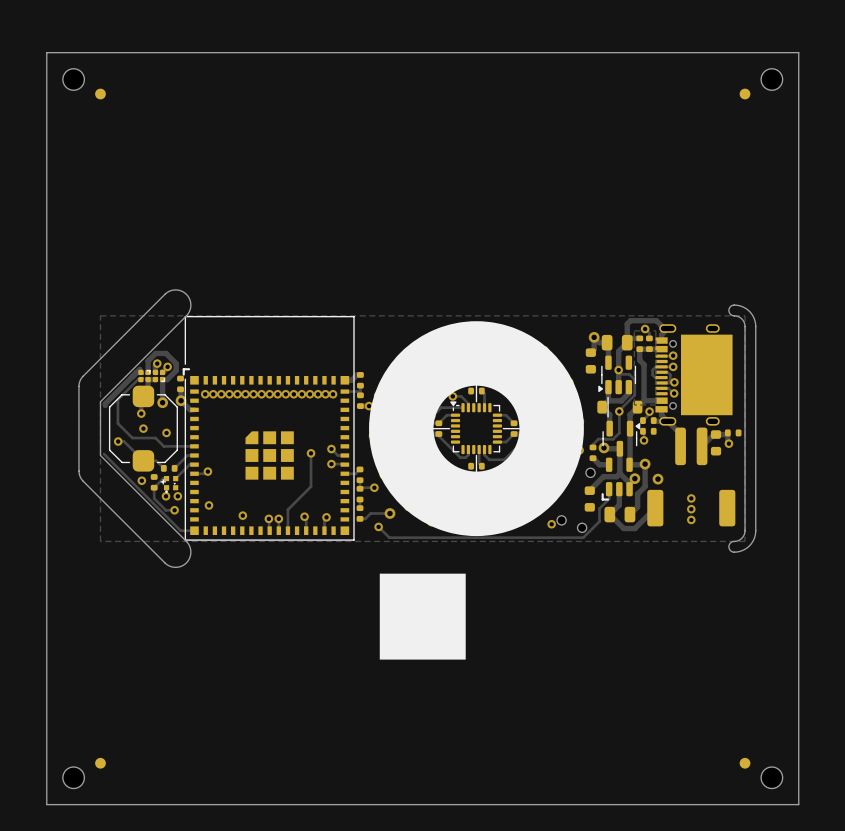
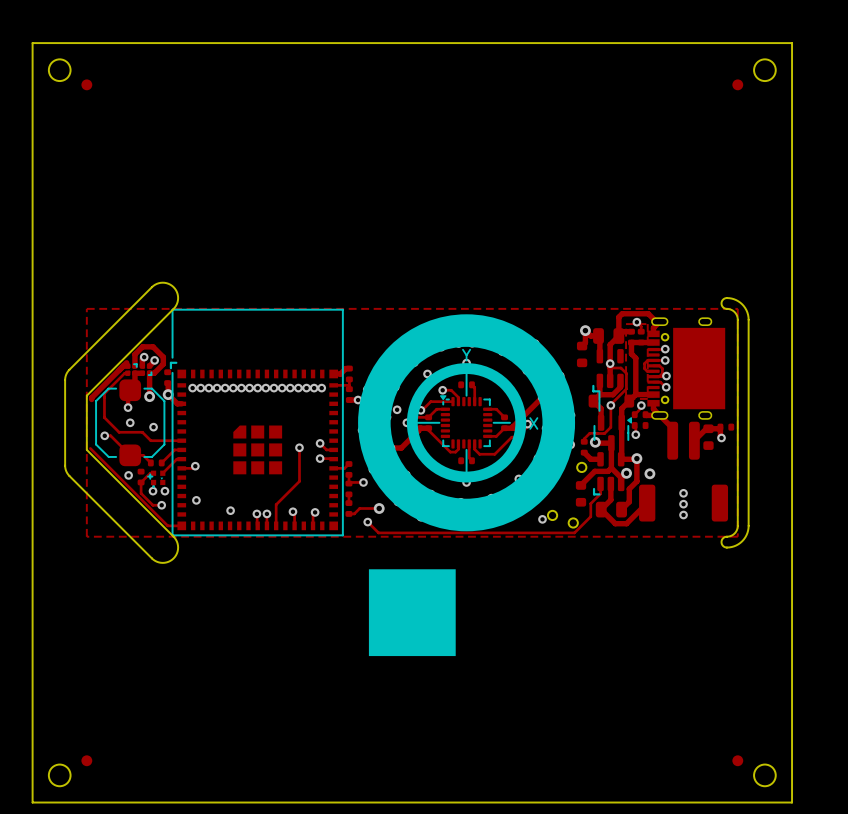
drawing: [369, 321, 584, 537] -> none
drawing: none -> [358, 314, 576, 532]
part footprint: [598, 355, 637, 395] -> [592, 349, 624, 393]
text: none -> Y (466, 355)
text: none -> X (533, 423)

